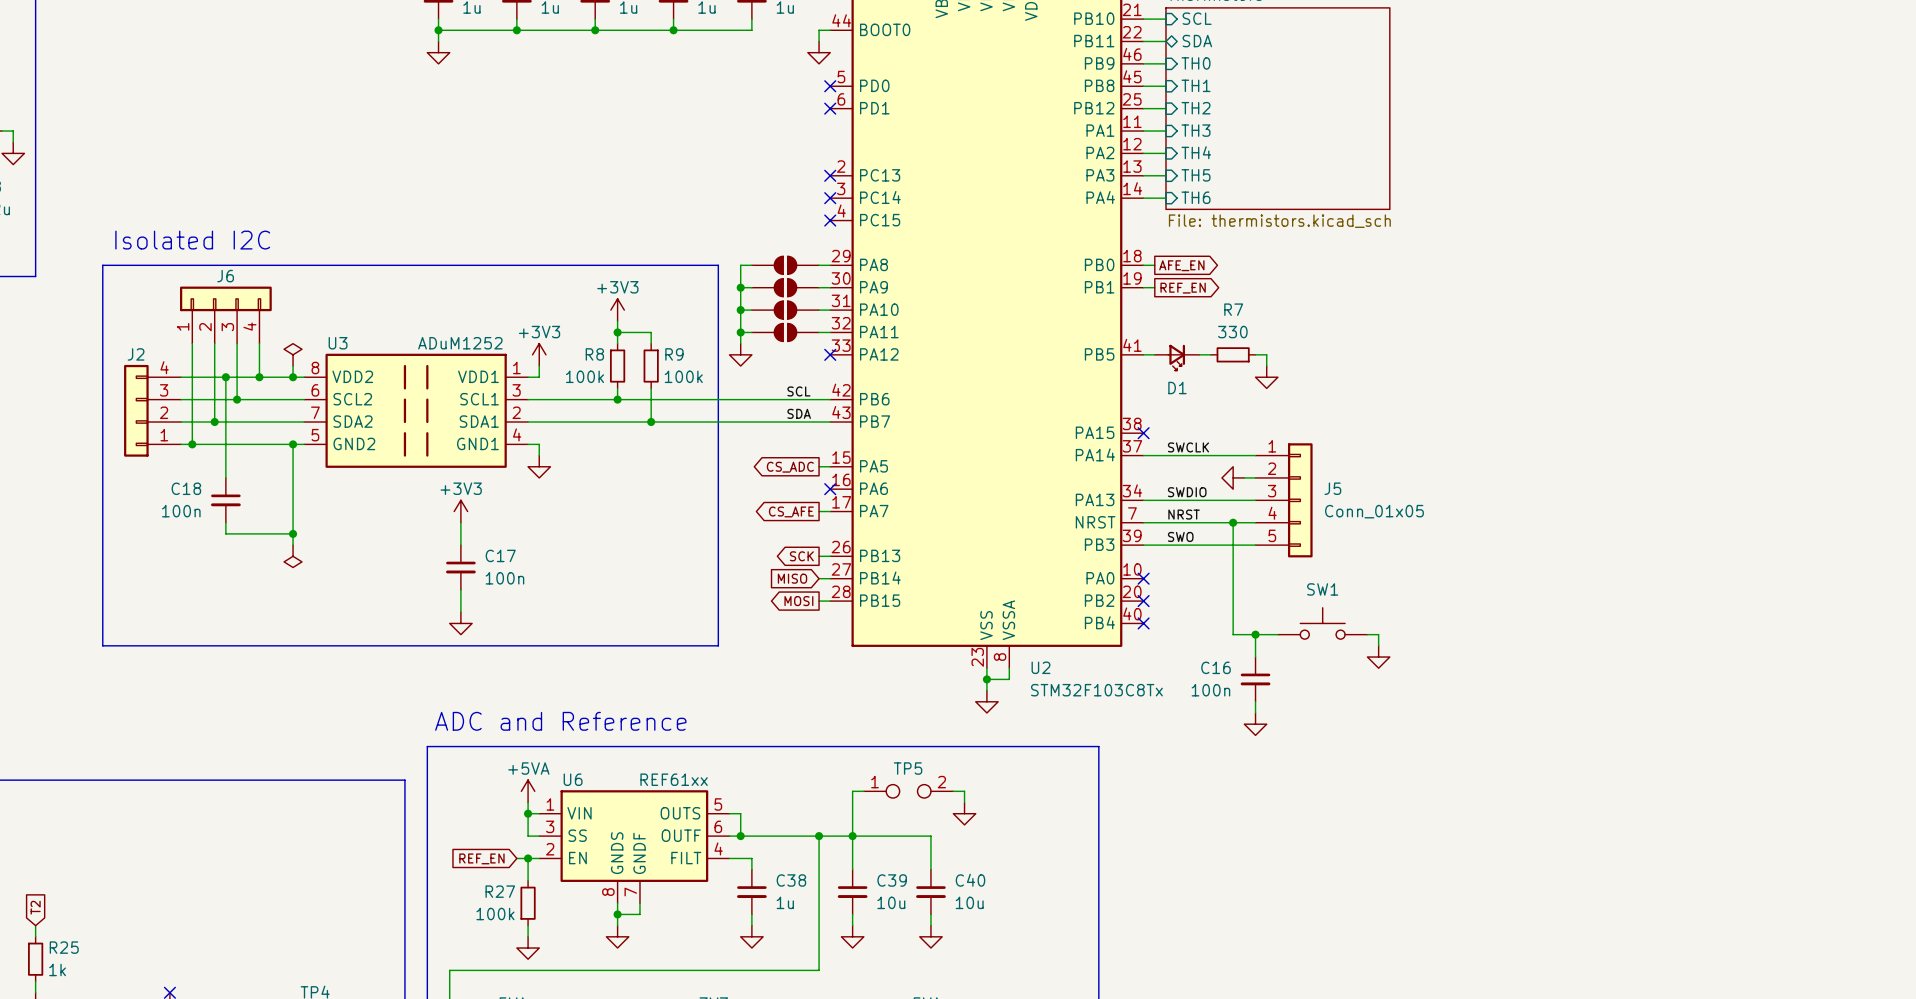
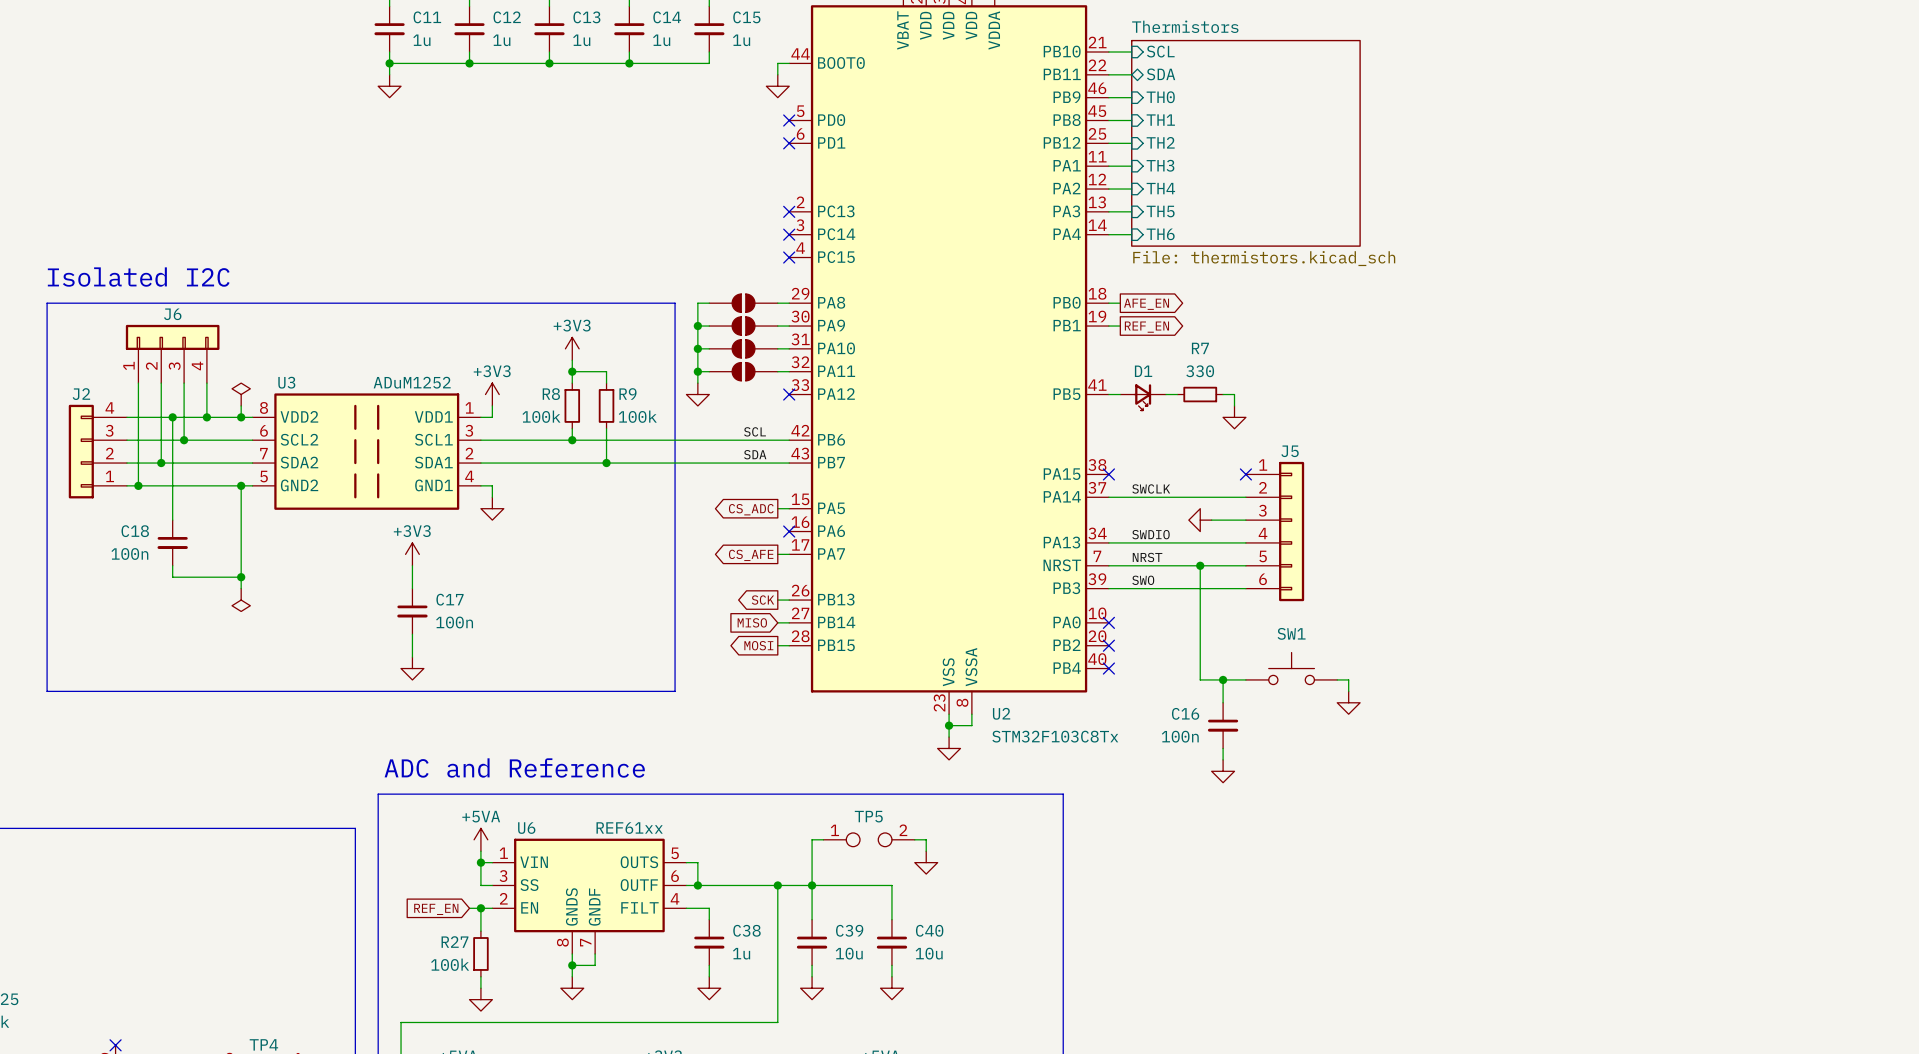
D1 name position: D1 (1177, 388) -> D1 (1143, 371)
no-connect mark: none -> (1245, 474)
J5 symbol: [1255, 443, 1313, 558] -> [1245, 461, 1305, 602]
J5 name position: J5 (1332, 488) -> J5 (1290, 451)
J5 value: Conn_01x05 (1374, 511) -> none

